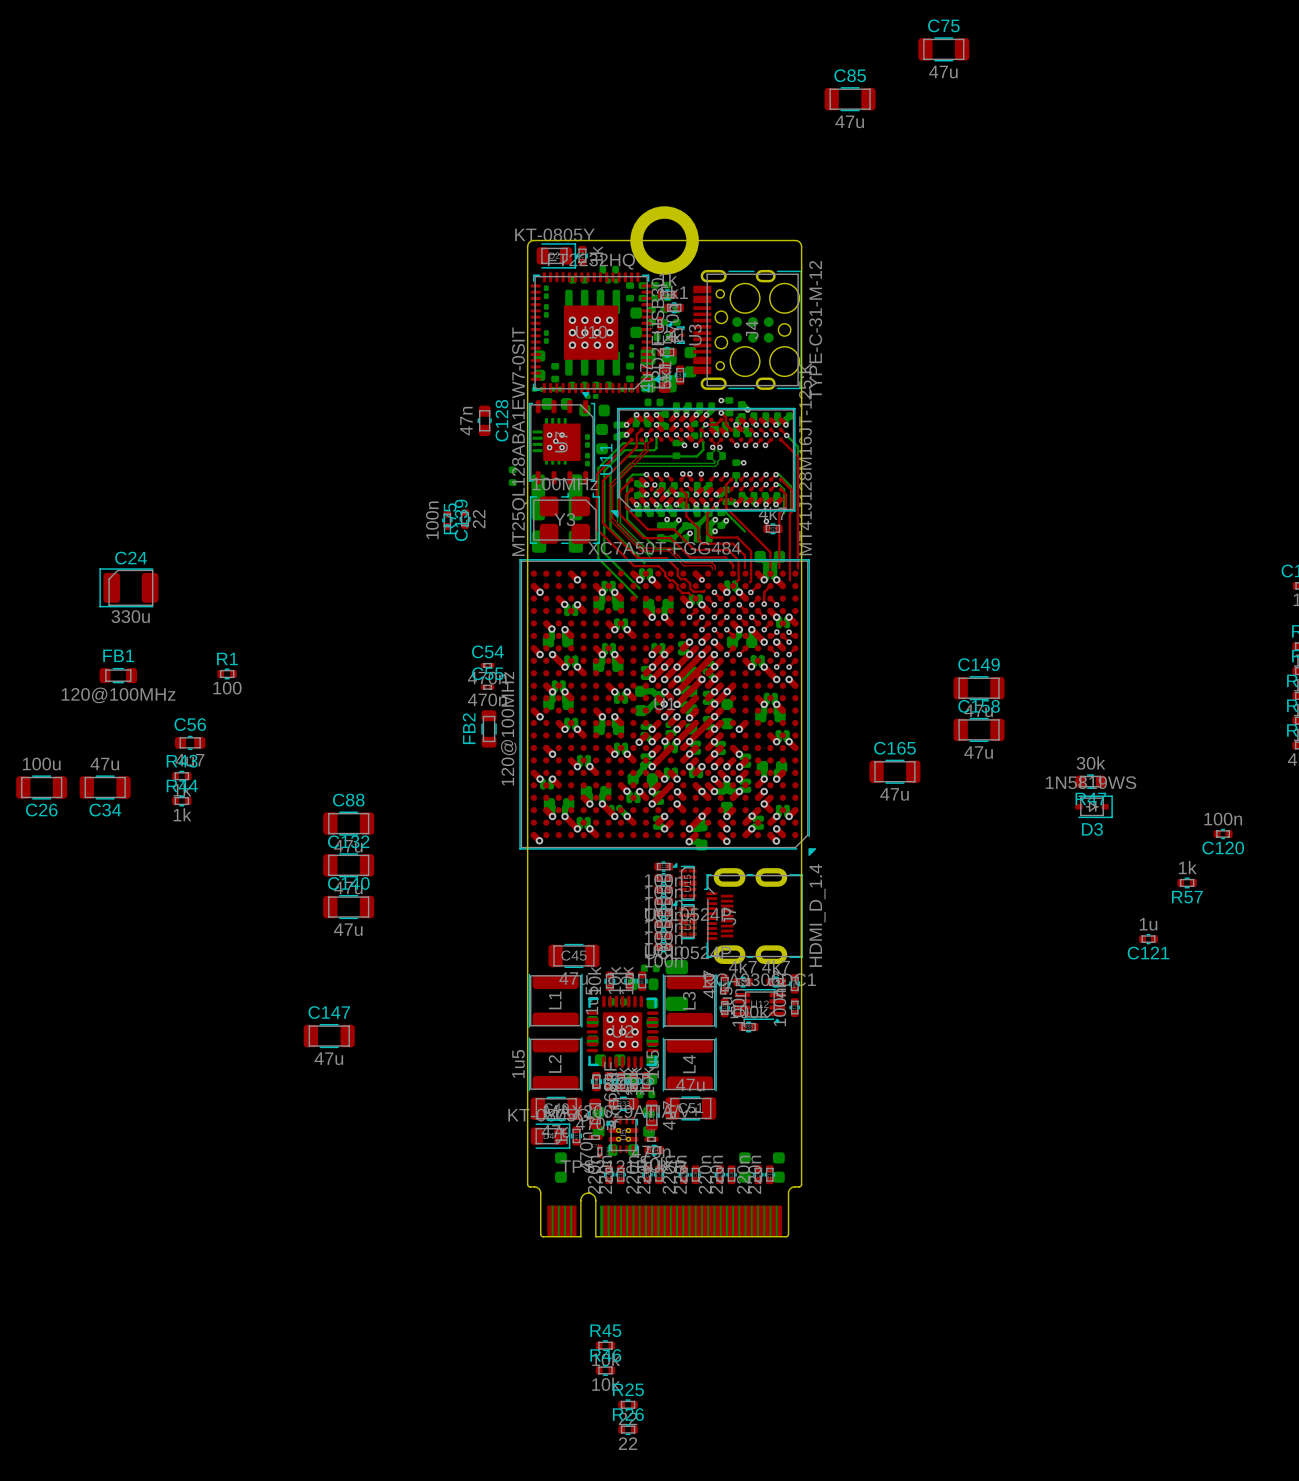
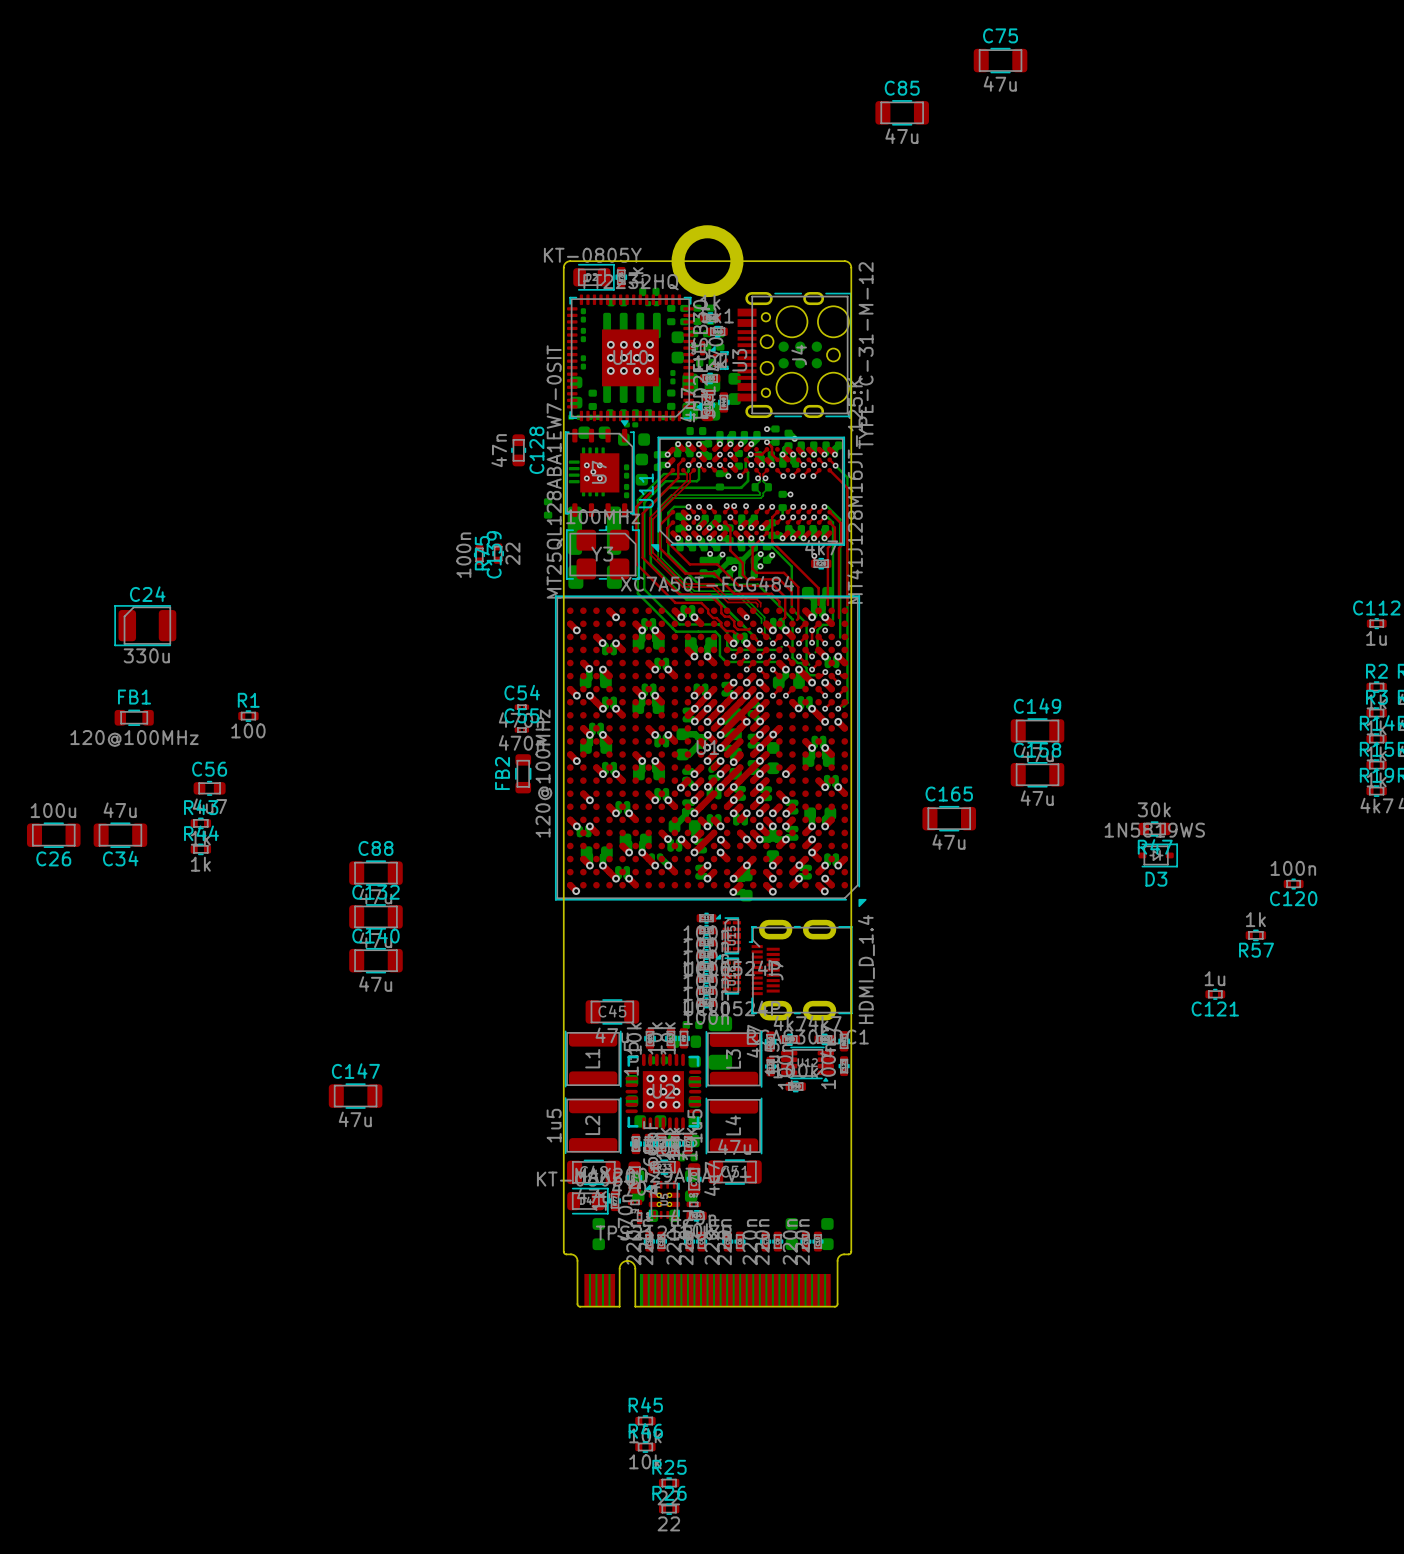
bottom track: none -> (840, 546) (840, 637)
bottom track: none -> (832, 547) (832, 619) (817, 630) (817, 650) (815, 652)
bottom track: none -> (847, 550) (847, 702) (843, 706)
bottom track: none -> (791, 566) (791, 608) (806, 623) (806, 662) (809, 664)
bottom track: none -> (723, 584) (757, 584) (792, 619) (792, 657) (797, 663) (801, 663) (810, 675) (820, 675)
bottom track: none -> (694, 591) (738, 591) (764, 617) (764, 623)
bottom track: (598, 557) (637, 597) -> (637, 593) (676, 631) (715, 631) (719, 636) (719, 655) (726, 661) (781, 661)
bottom track: none -> (693, 594) (737, 594) (761, 618) (761, 623)
bottom track: none -> (686, 599) (717, 599) (756, 638)
bottom track: none -> (764, 623) (764, 633) (770, 638)
bottom track: (637, 586) (639, 588) -> (679, 624) (719, 624) (727, 632) (727, 646) (730, 649) (778, 649) (781, 646)
via: none -> (812, 630)
via: none -> (825, 630)
via: none -> (838, 643)

